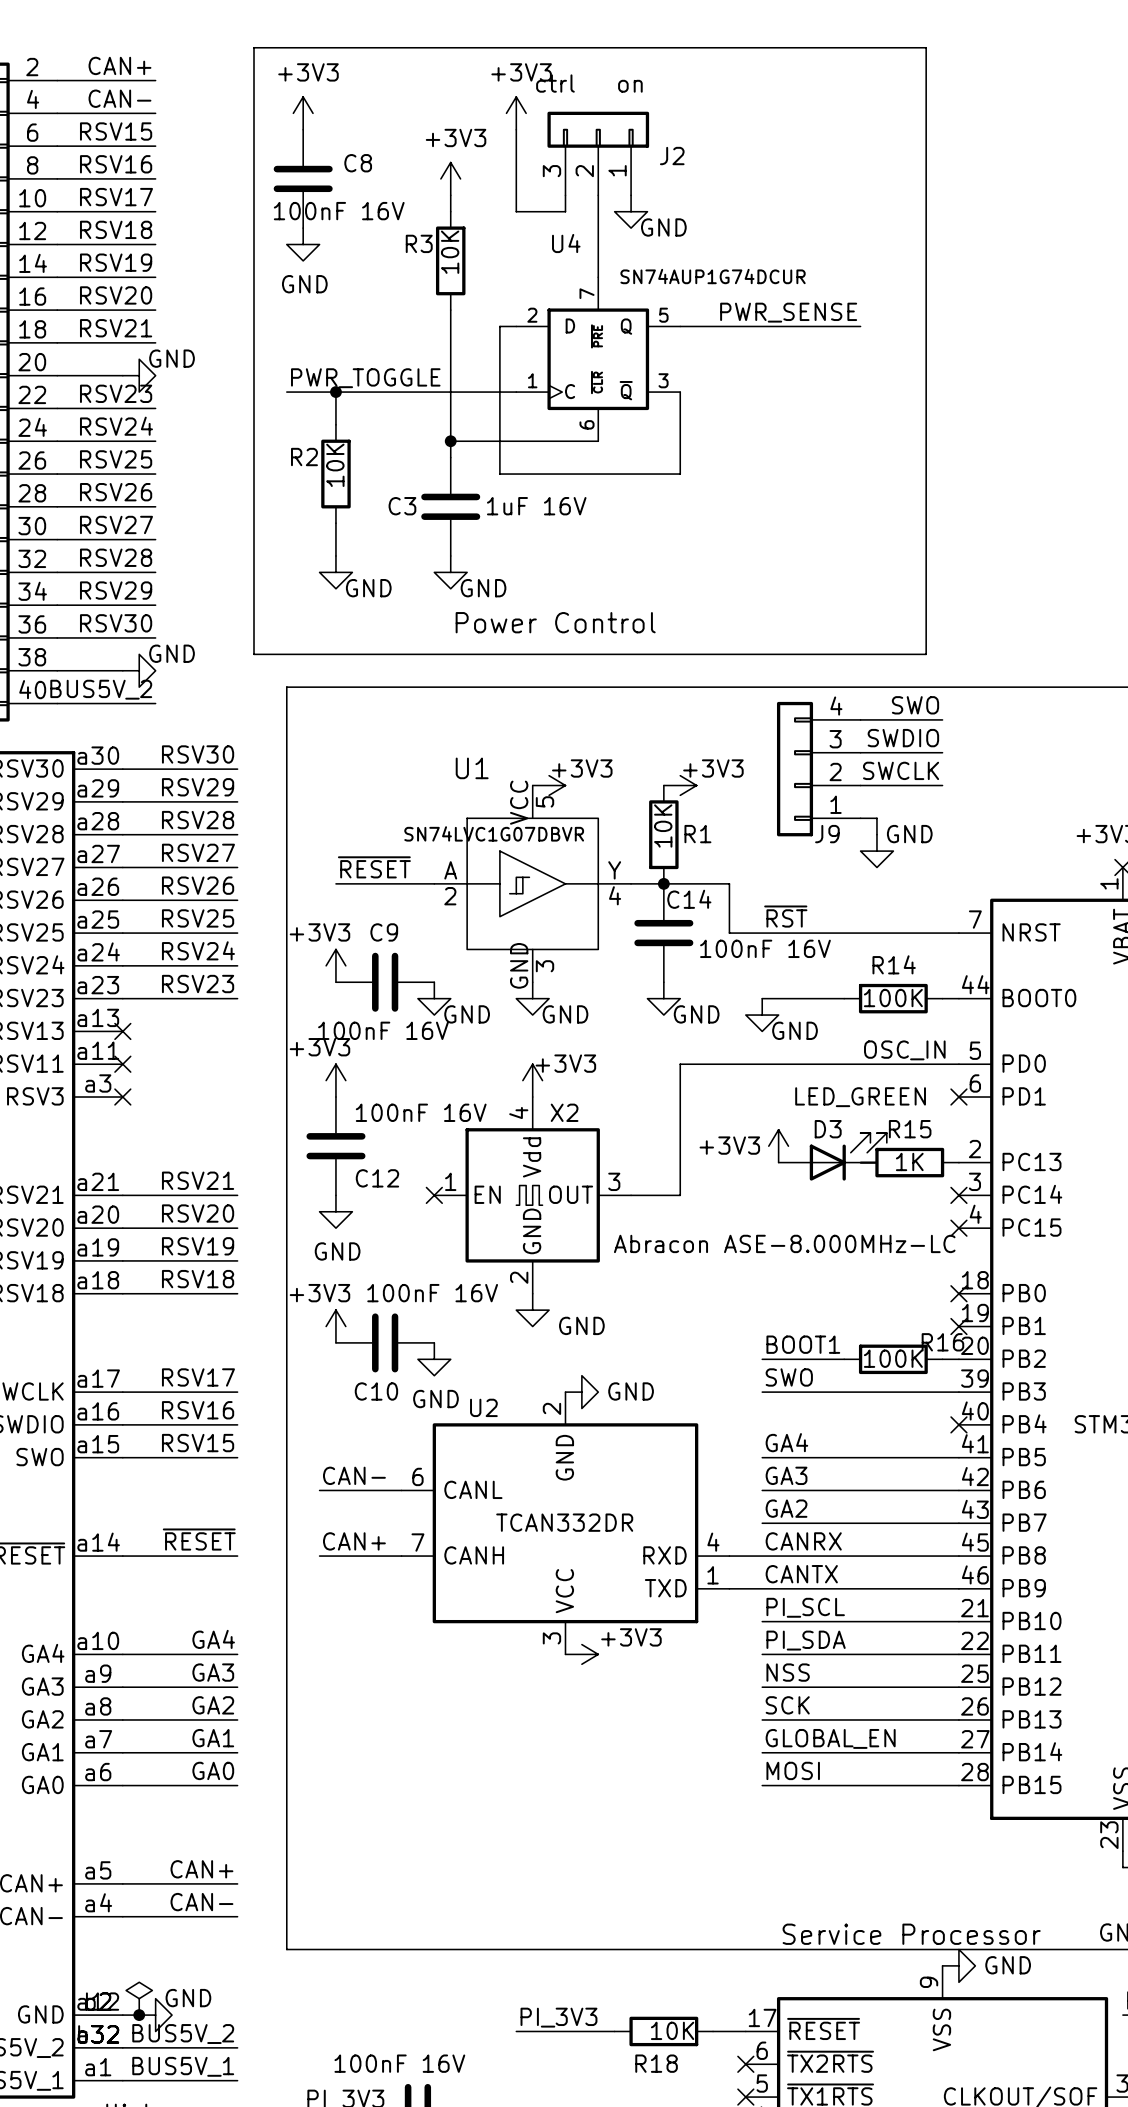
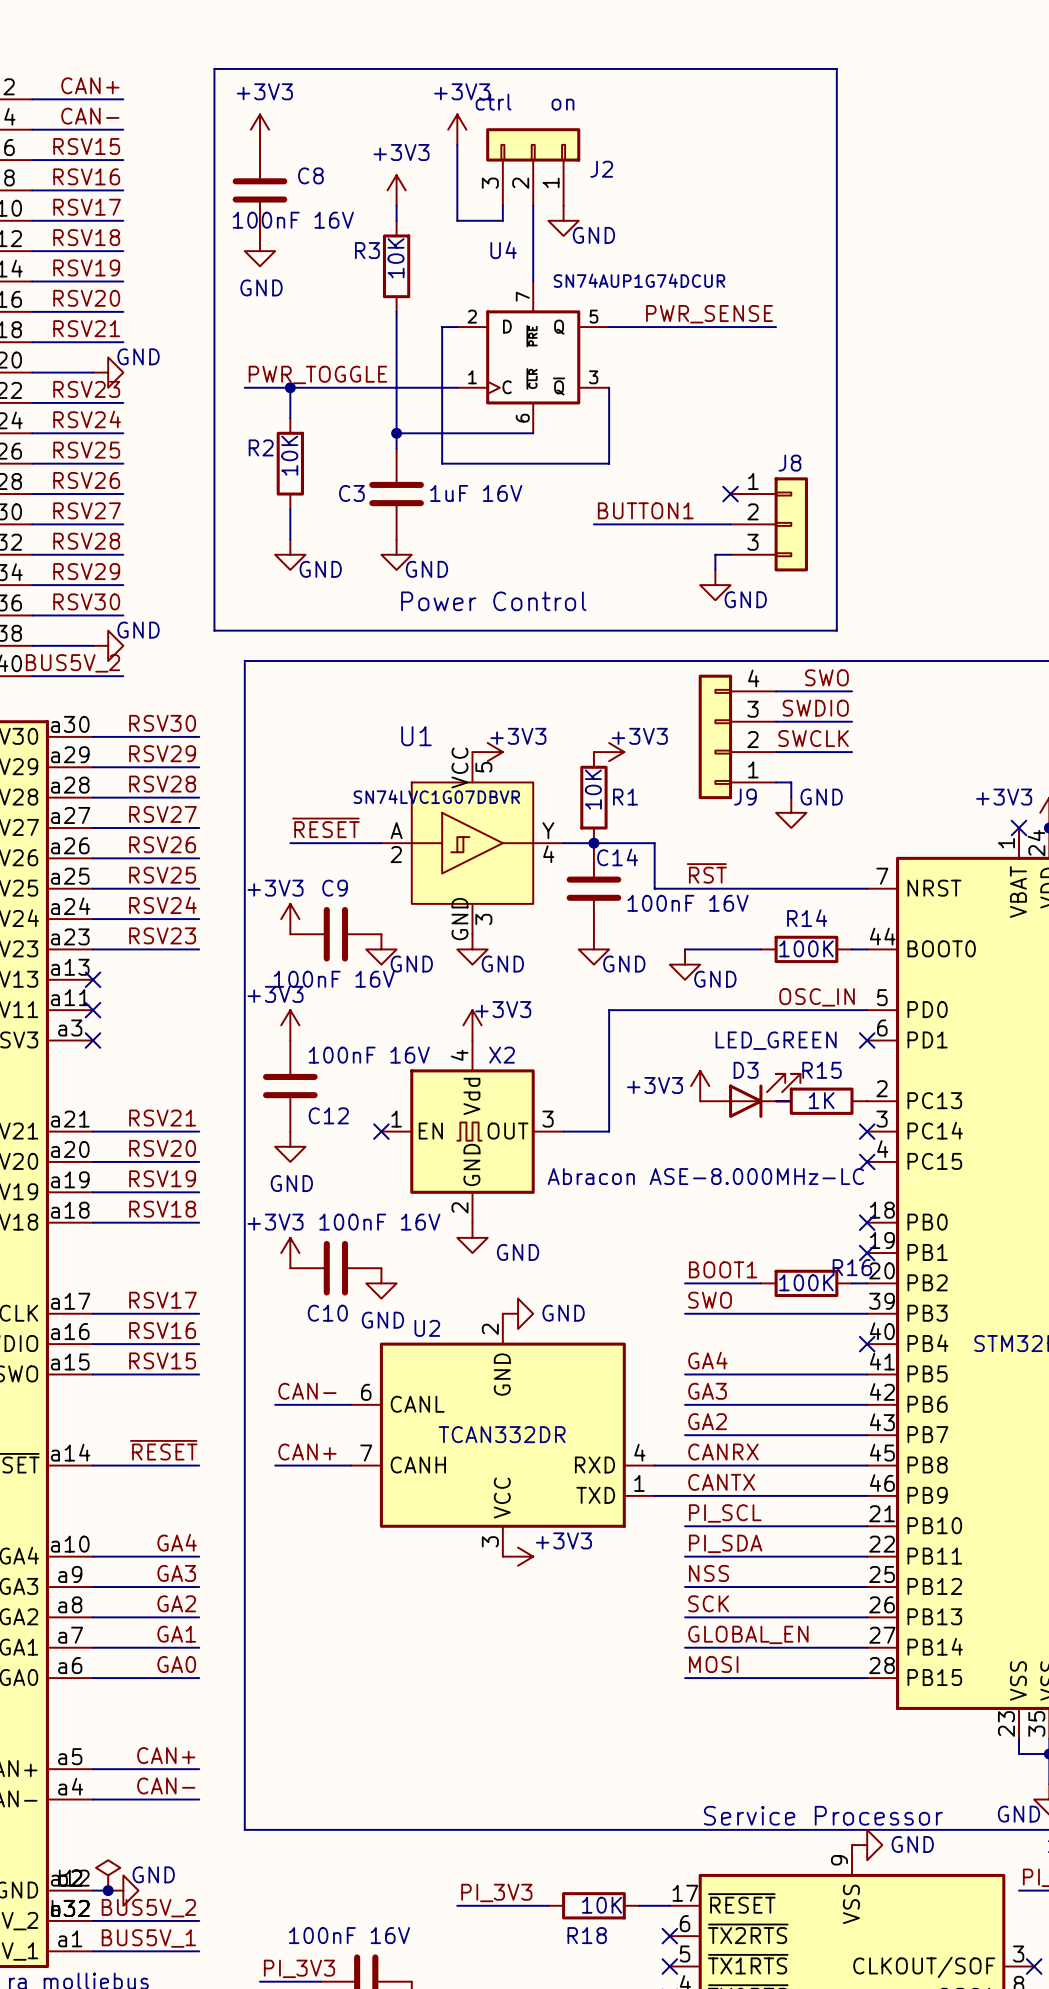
no-connect mark: none -> (730, 494)
label: none -> BUTTON1 (645, 510)
wire: none -> (593, 524) (730, 524)
J8: none -> (769, 524)
wire: none -> (730, 554) (715, 554) (715, 569)
power symbol: none -> GND (715, 585)

